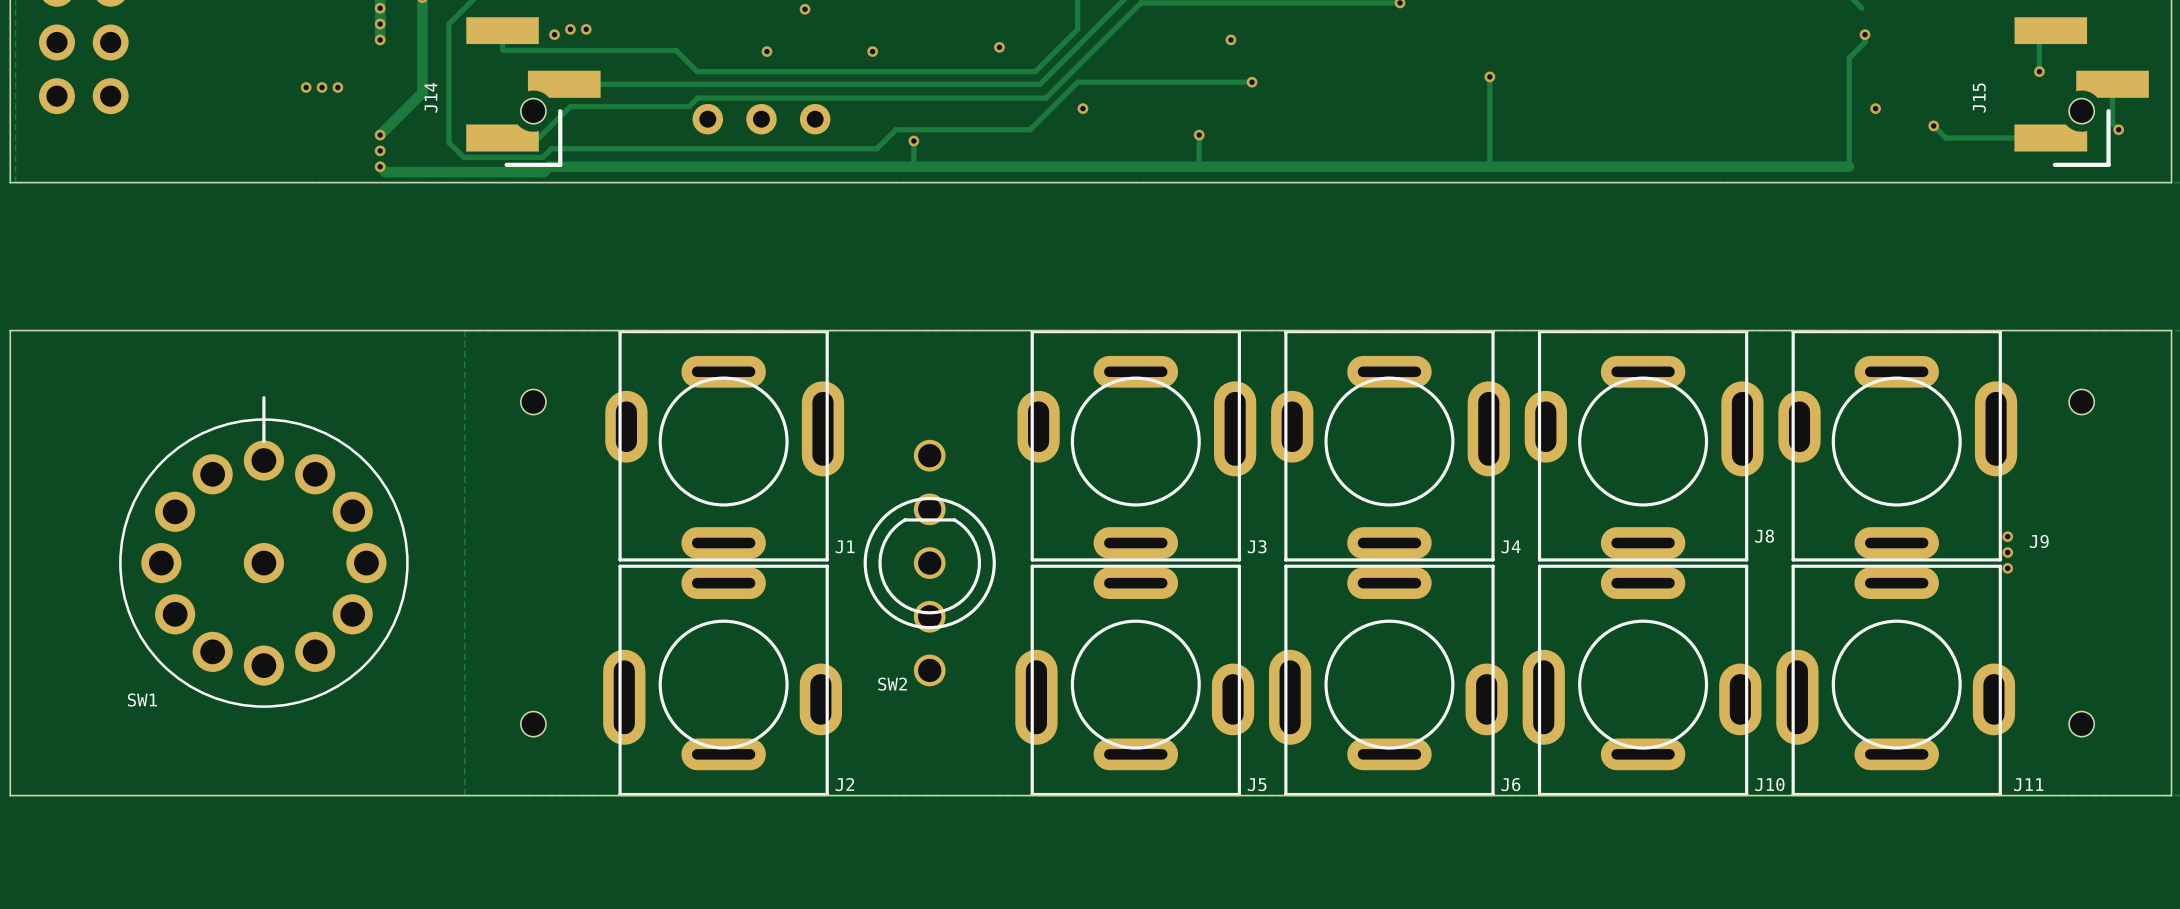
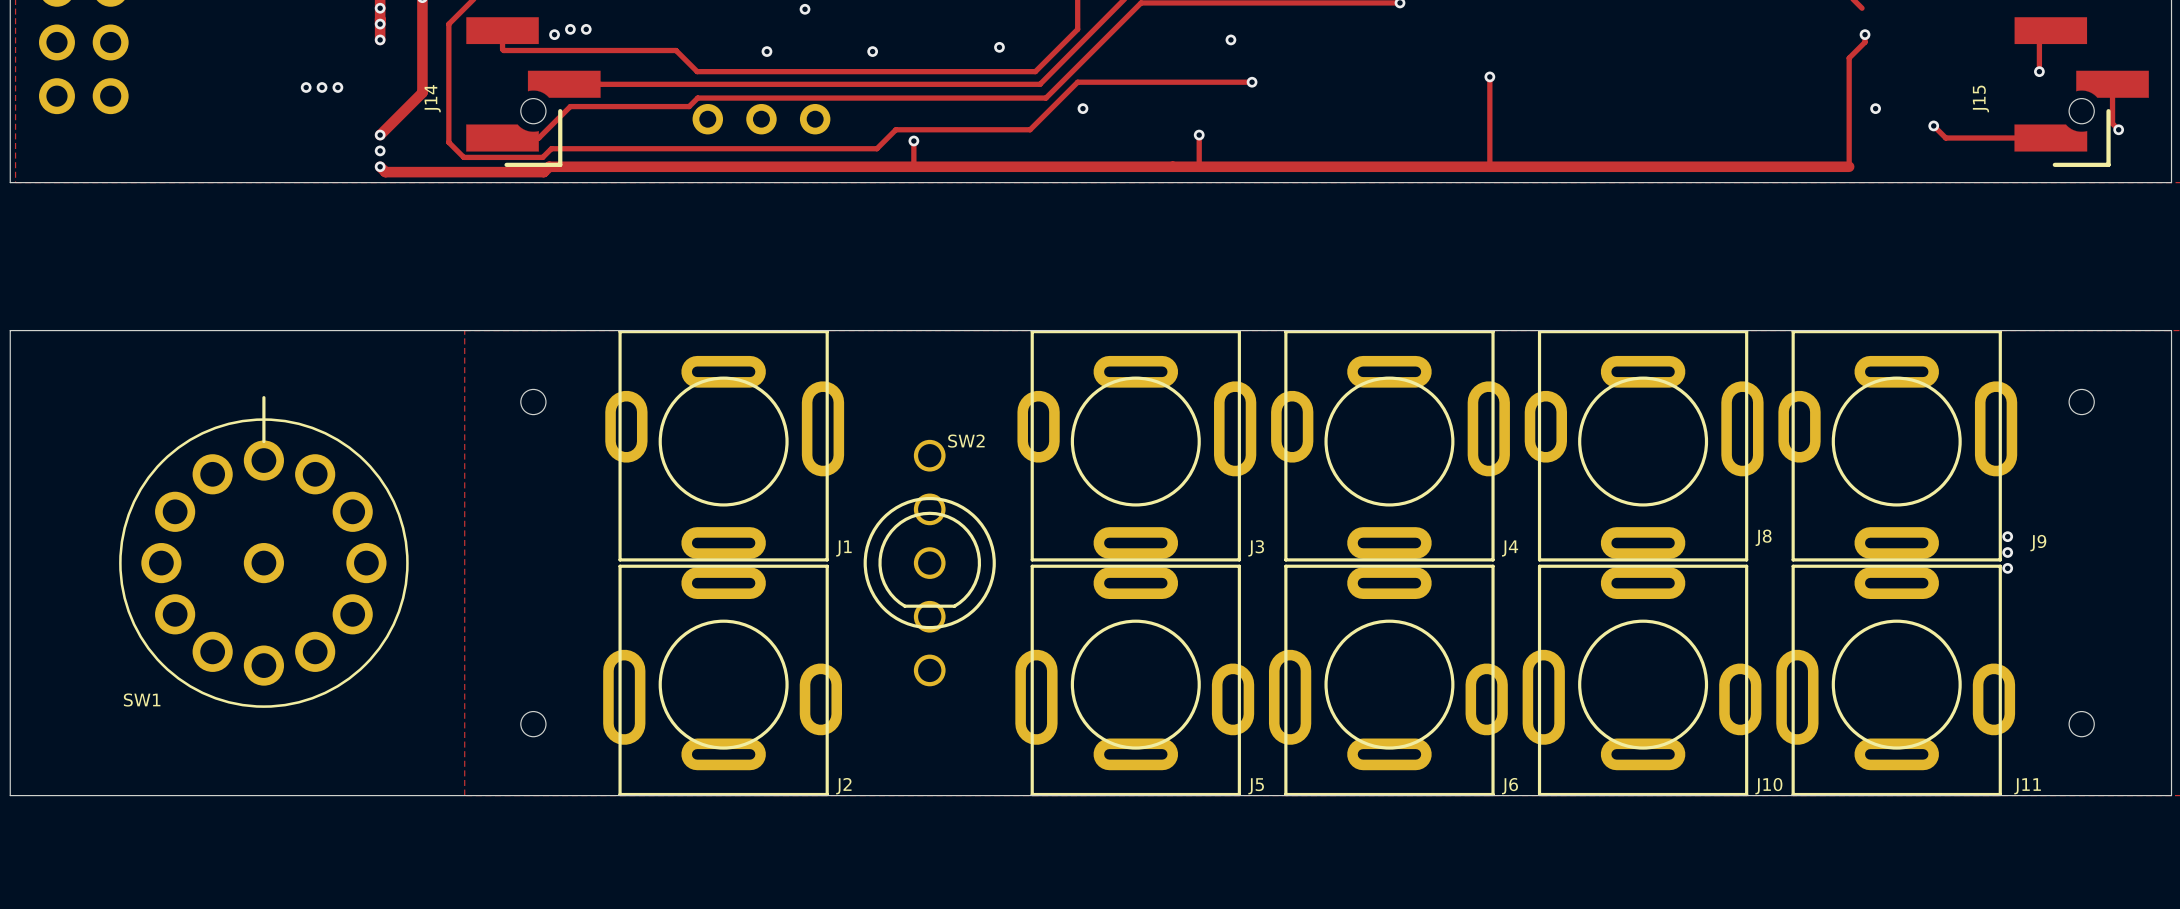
SW2 rotation: 0° (929, 563) -> 180° (929, 563)

